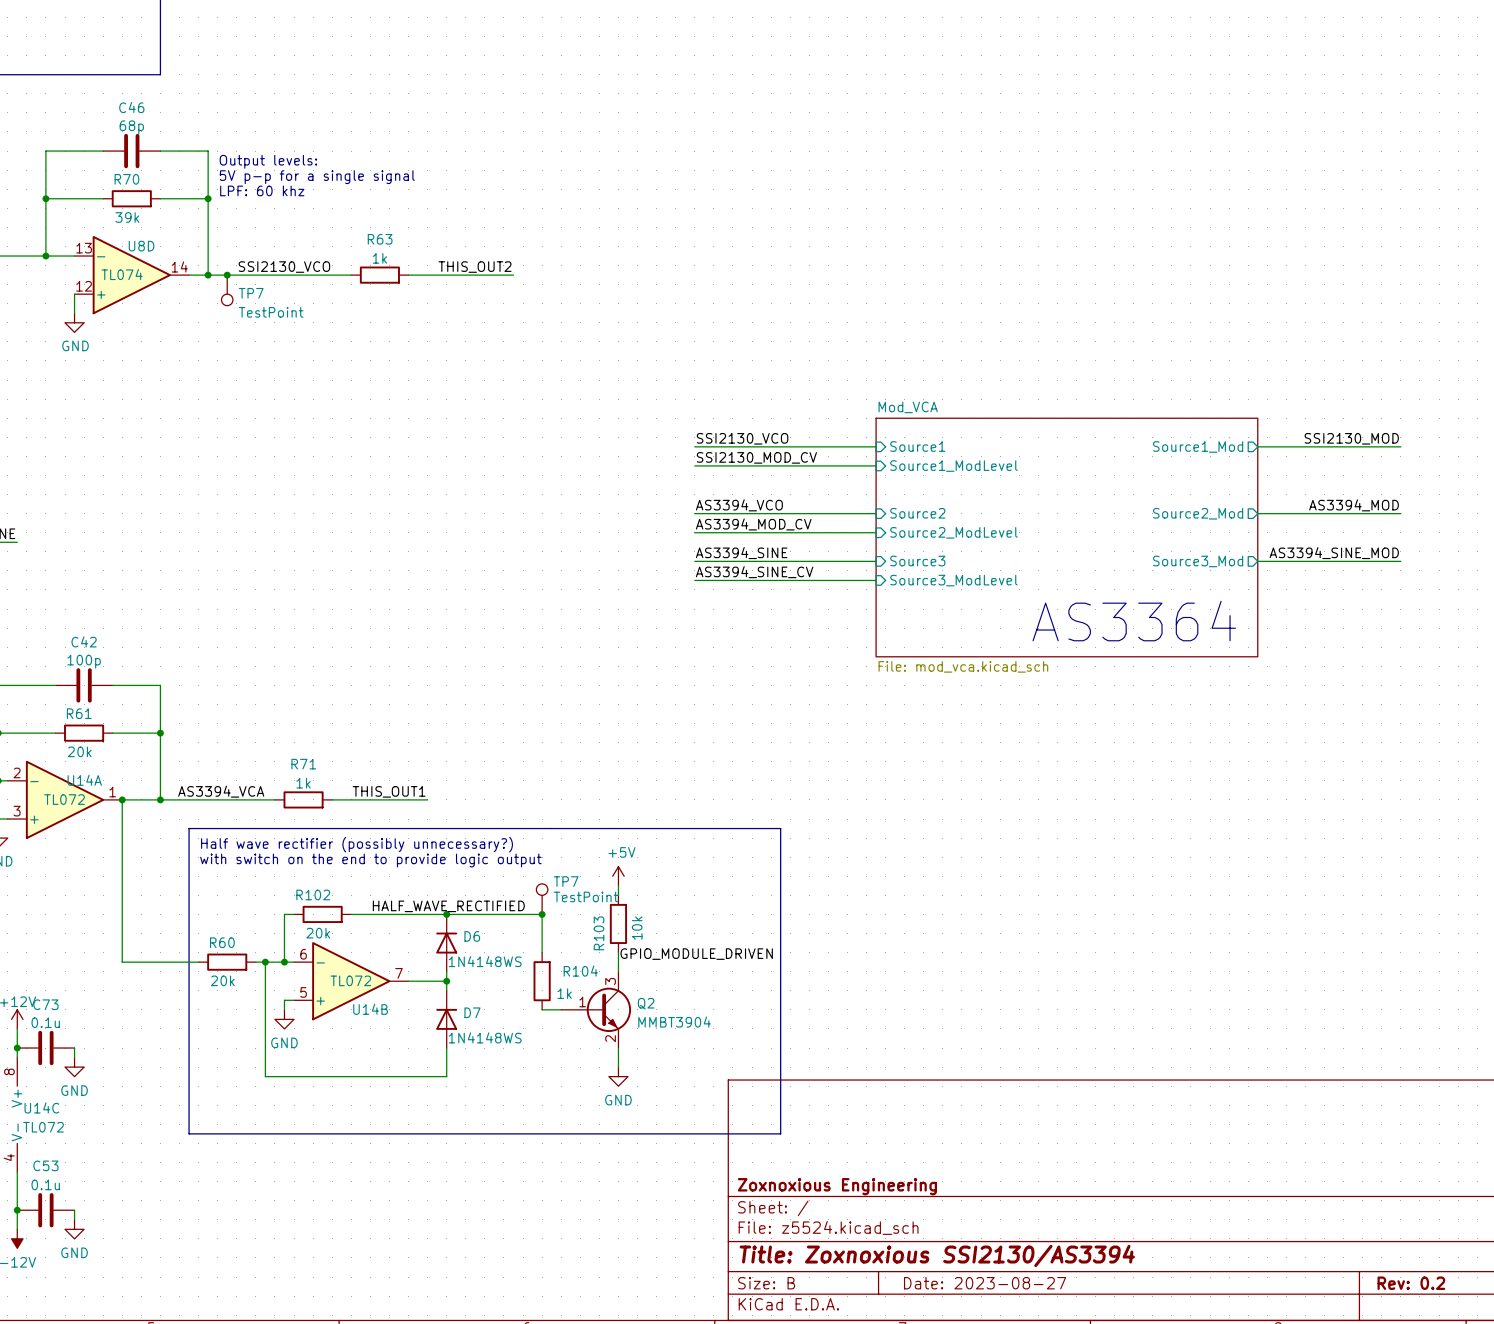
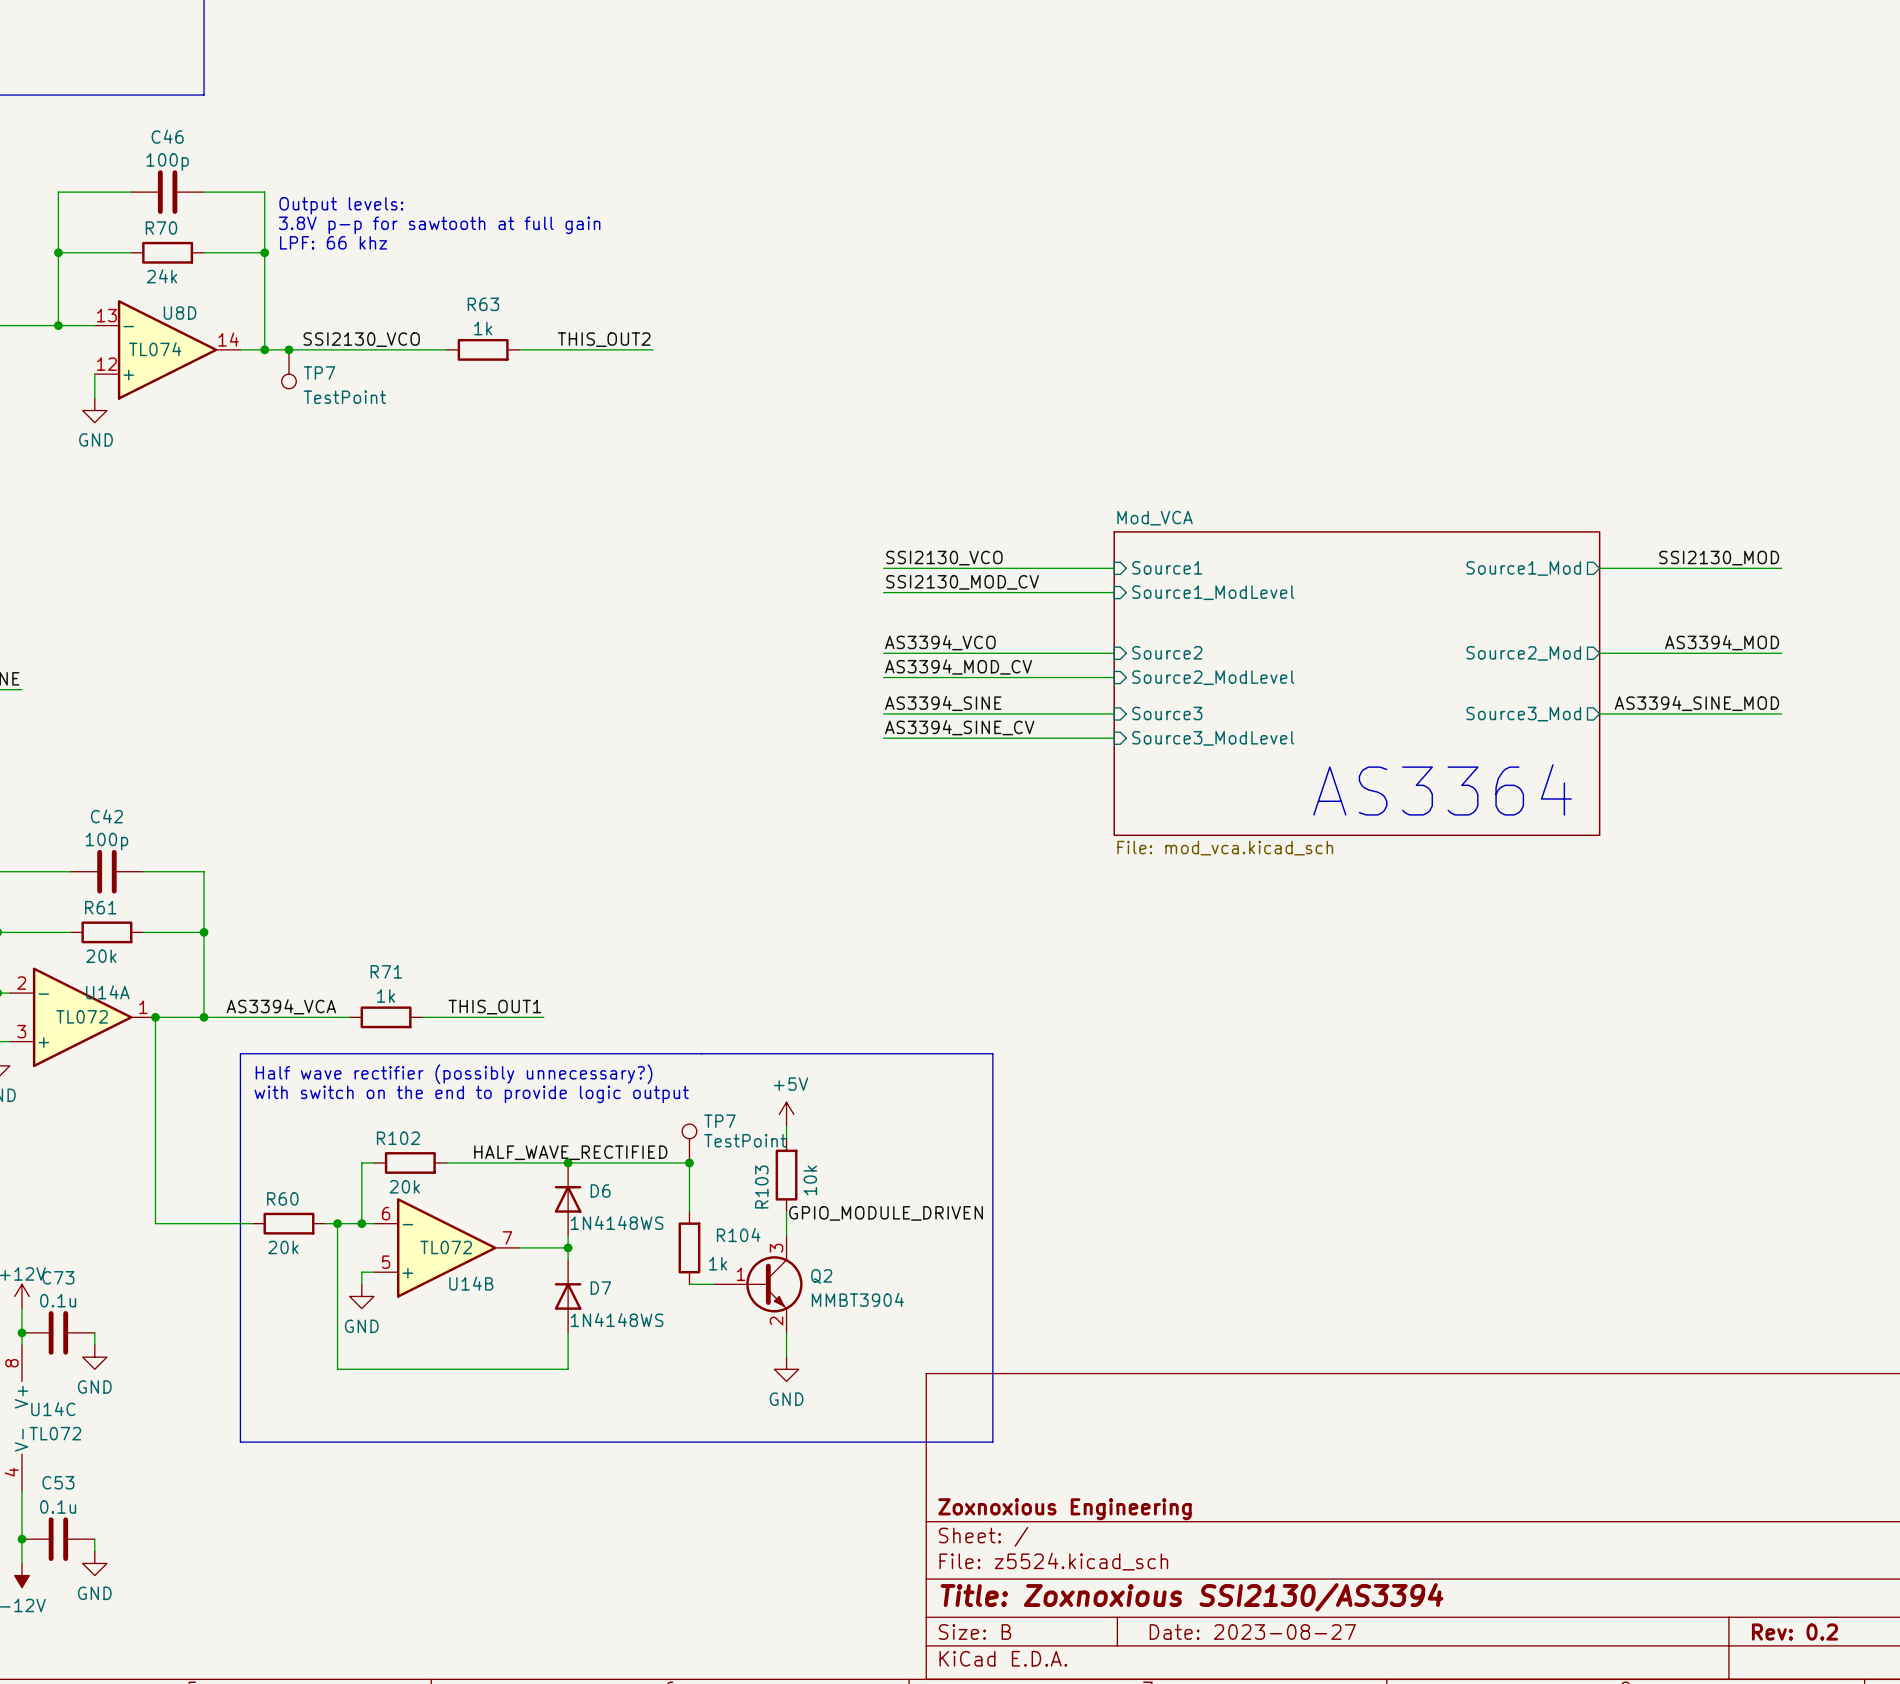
C46 value: 68p (131, 127) -> 100p (167, 161)
text: 5V p-p for a single signal (317, 177) -> 3.8V p-p for sawtooth at full gain (439, 225)
text: LPF: 60 khz (262, 190) -> LPF: 66 khz (333, 242)
R70 value: 39k (127, 217) -> 24k (162, 276)

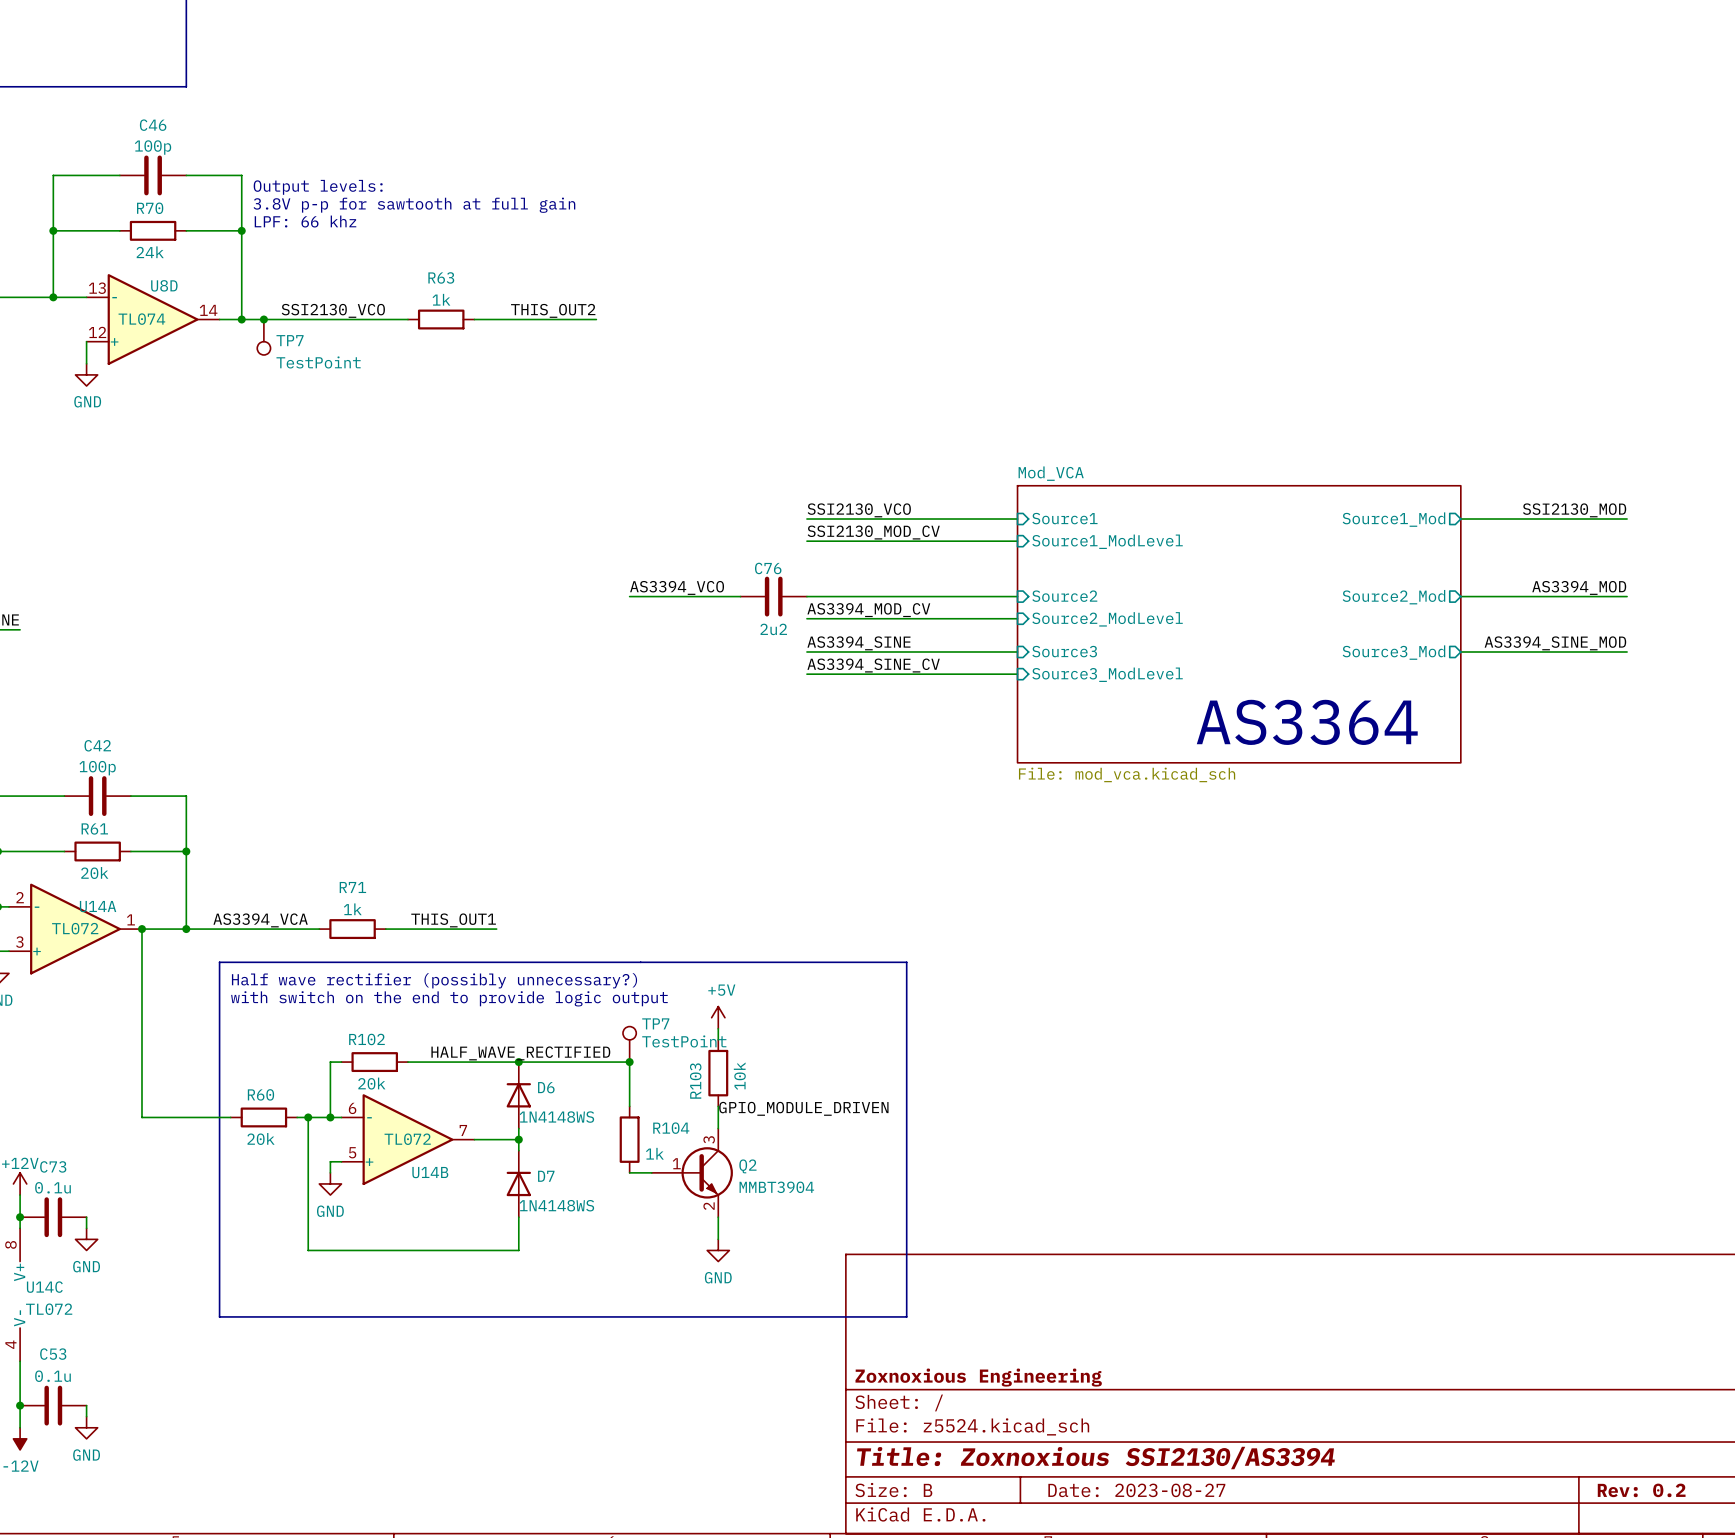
label position: AS3394_VCO (940, 642) -> AS3394_VCO (677, 587)
wire: none -> (629, 596) (740, 596)
C76: none -> 2u2 (773, 596)

